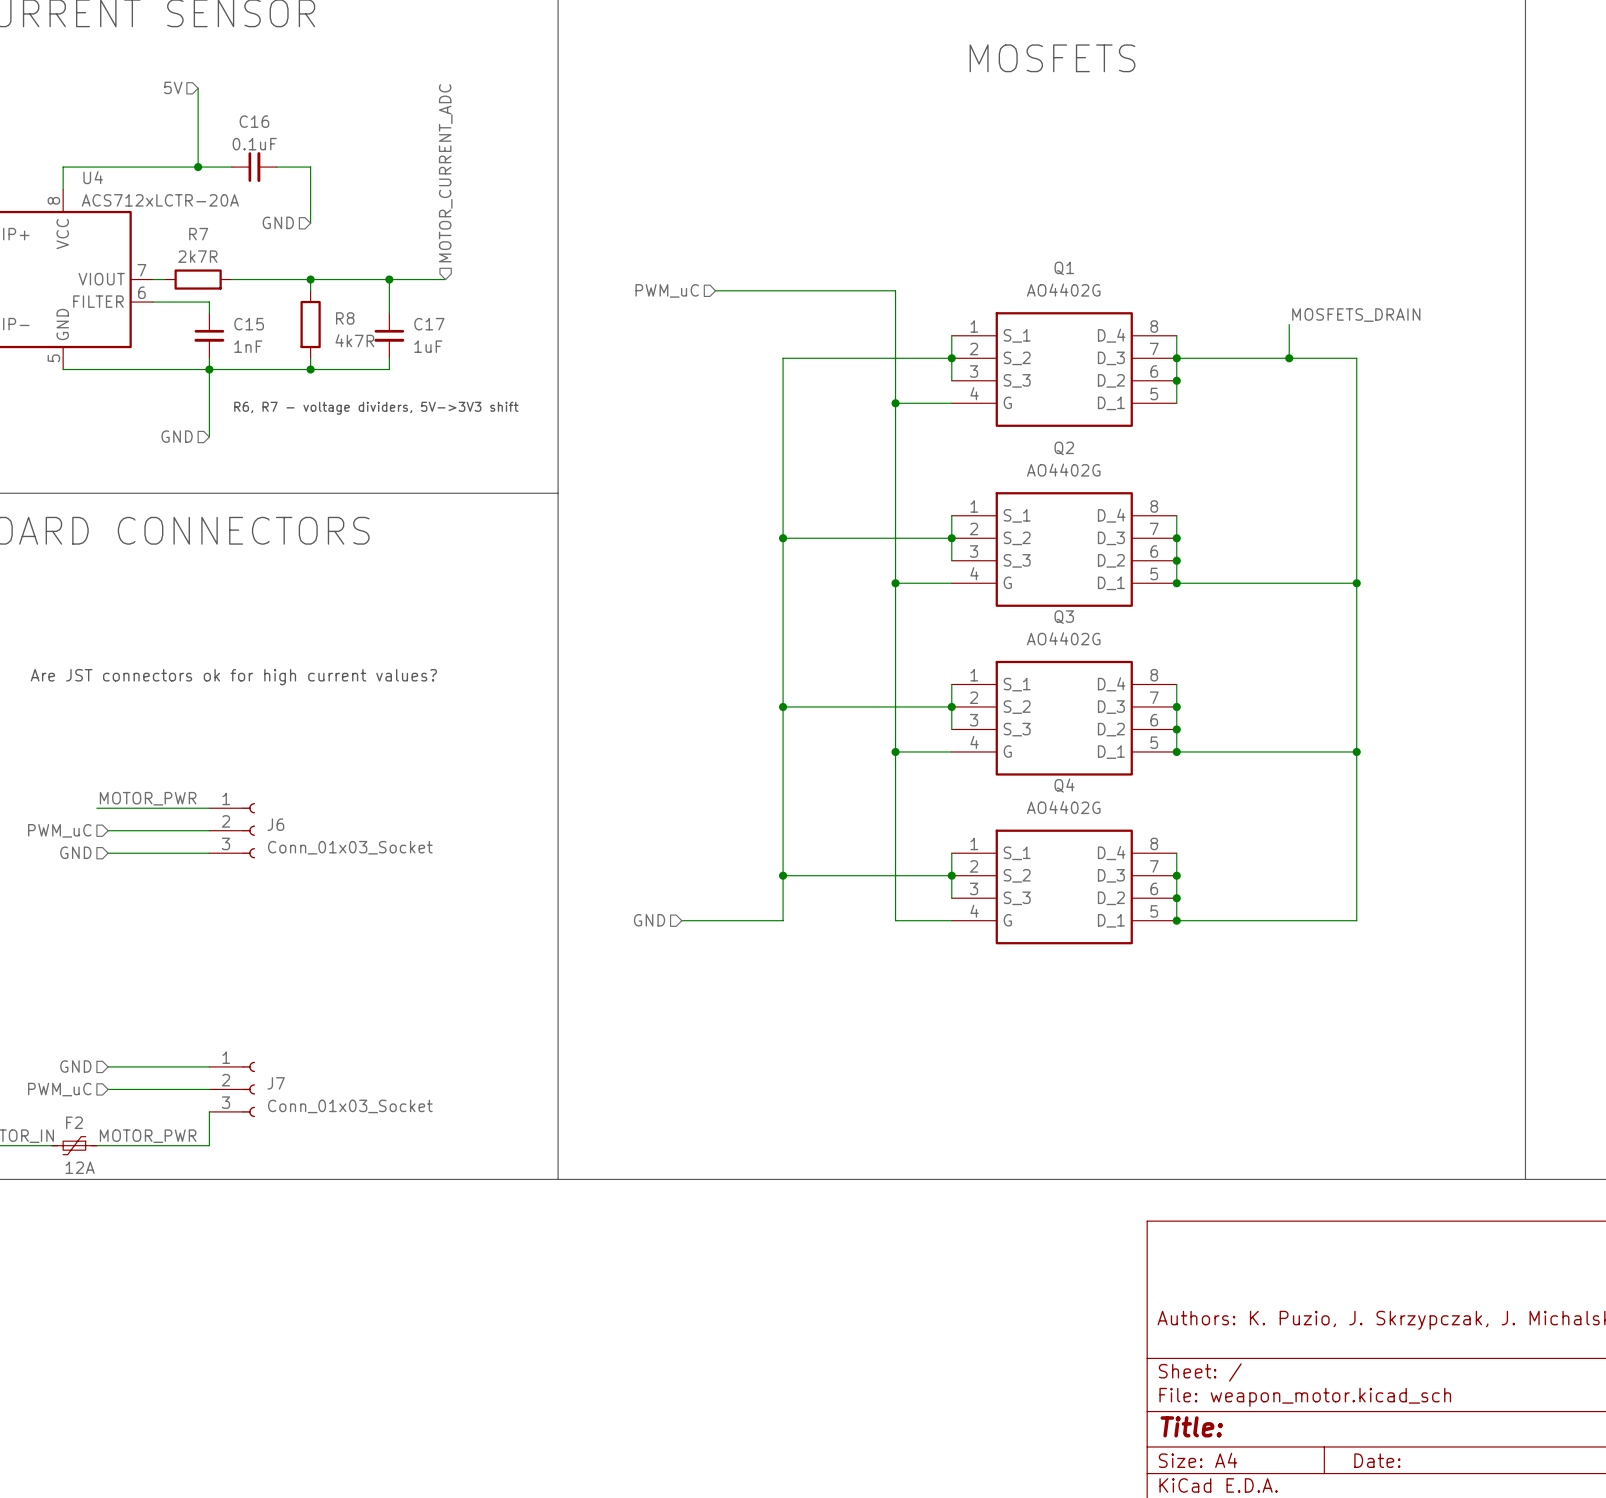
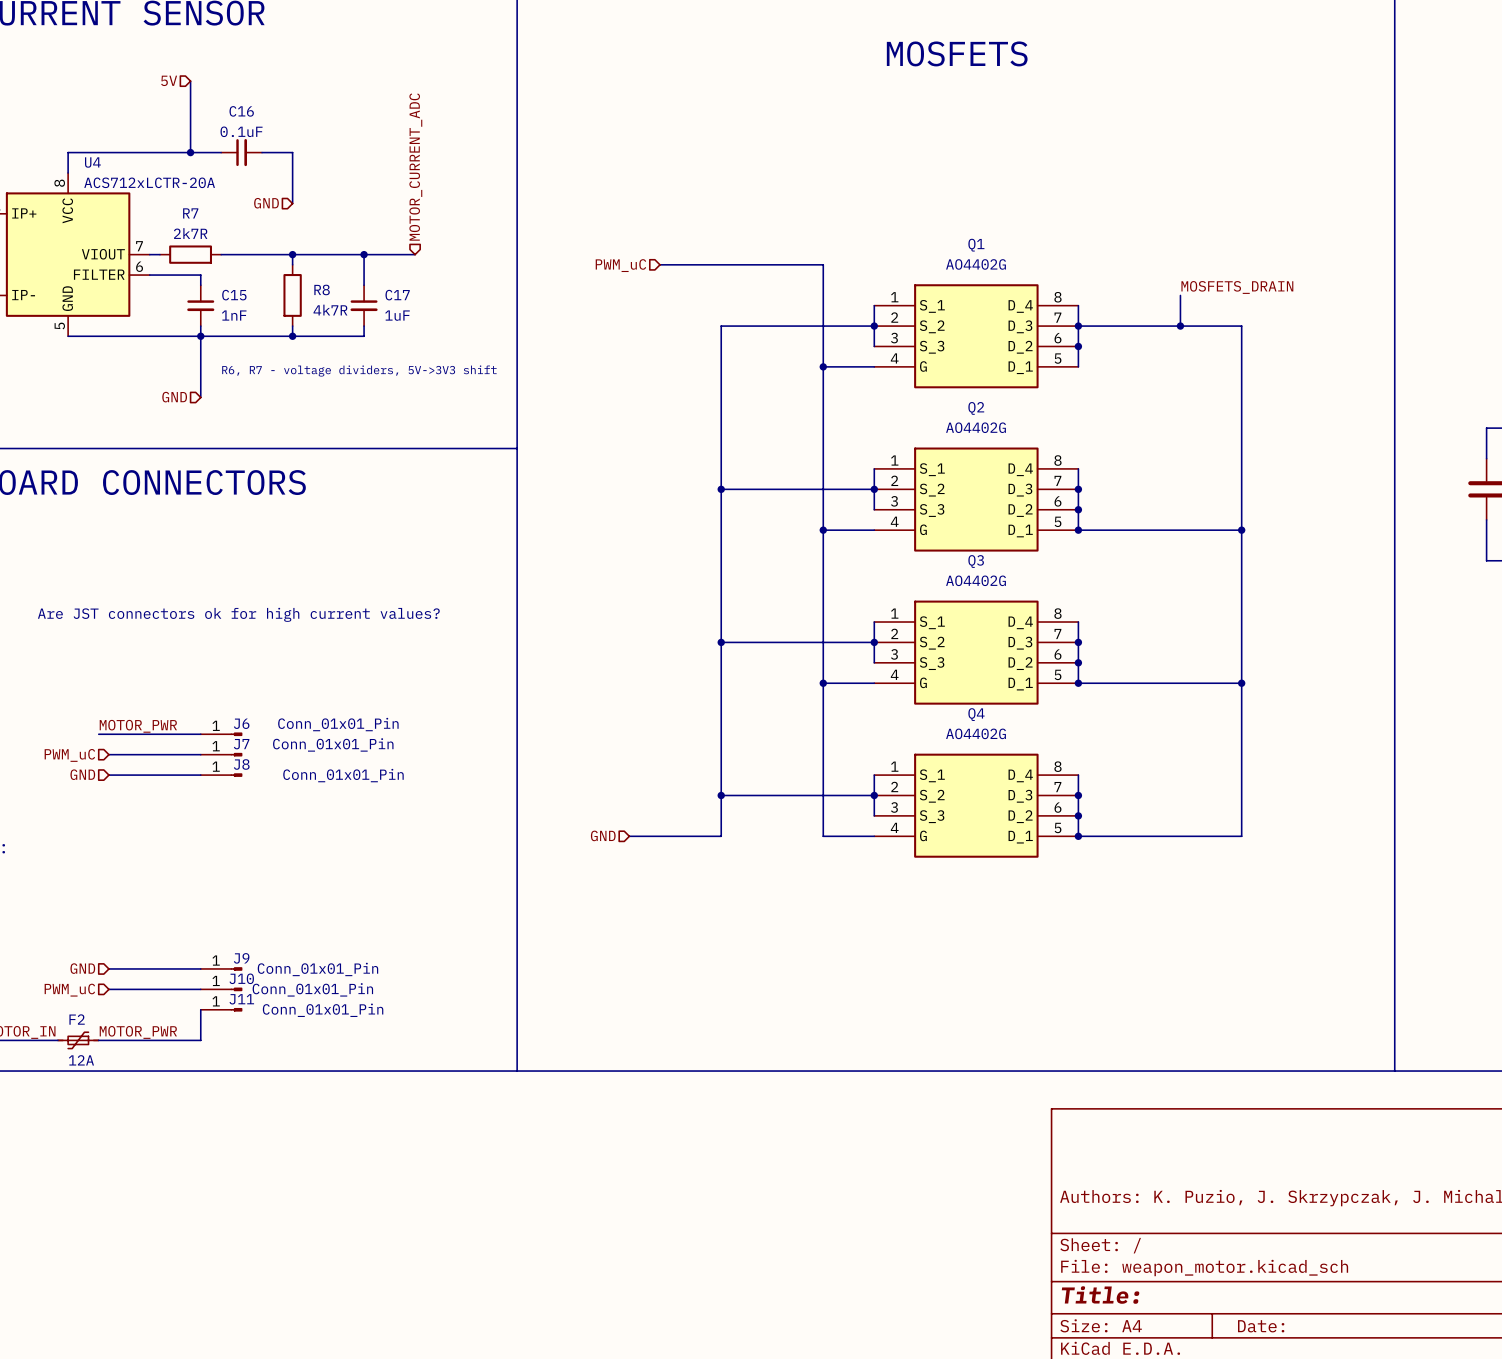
J6 symbol: [209, 803, 256, 859] -> [200, 732, 243, 736]
J6 name position: J6 (275, 824) -> J6 (241, 723)
J6 value: Conn_01x03_Socket (350, 847) -> Conn_01x01_Pin (338, 724)
J8: none -> Conn_01x01_Pin (221, 775)
J7 symbol: [209, 1061, 256, 1118] -> [200, 753, 243, 757]
J9: none -> Conn_01x01_Pin (221, 968)
J7 name position: J7 (276, 1083) -> J7 (241, 744)
J10: none -> Conn_01x01_Pin (221, 989)
J7 value: Conn_01x03_Socket (350, 1106) -> Conn_01x01_Pin (333, 744)
J11: none -> Conn_01x01_Pin (221, 1009)

